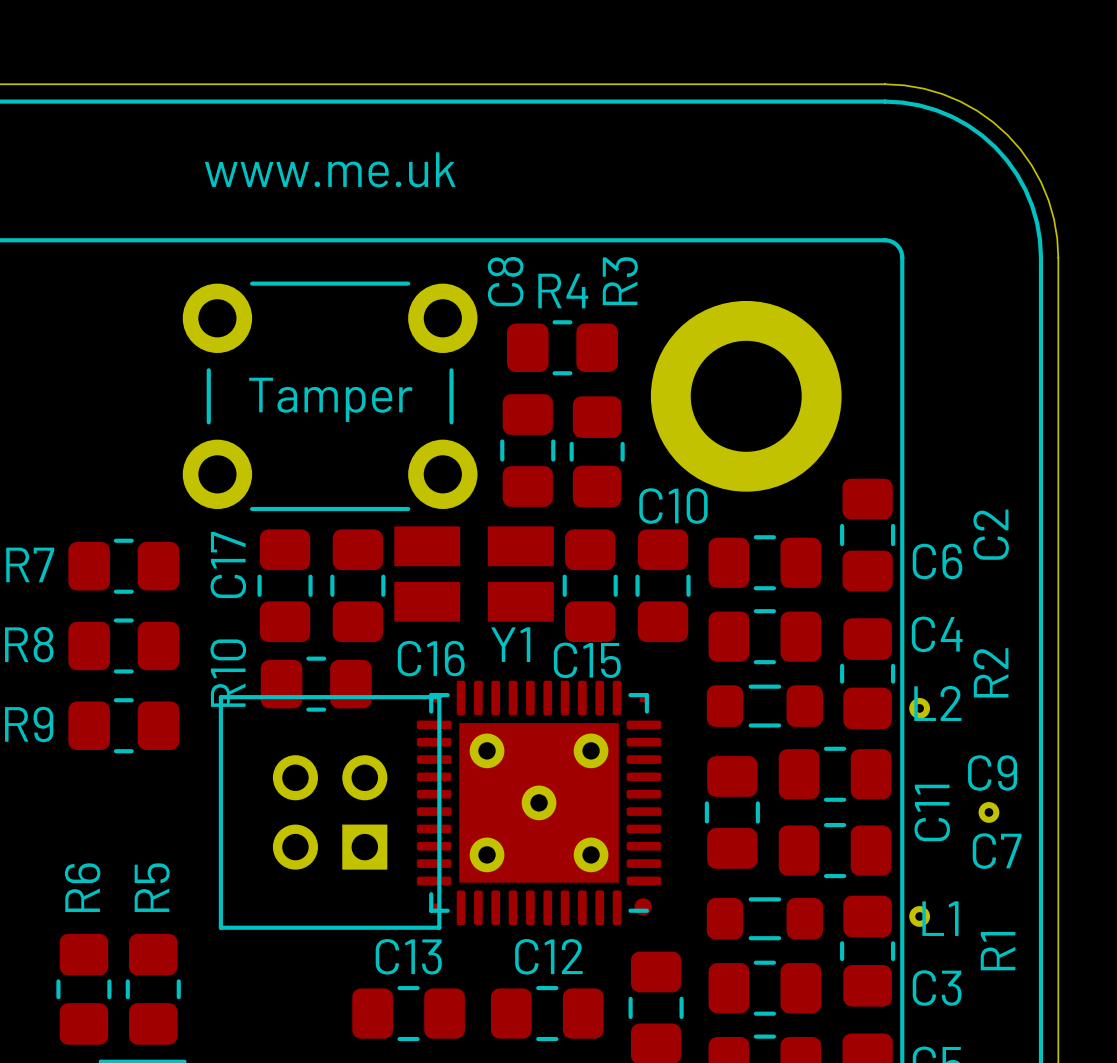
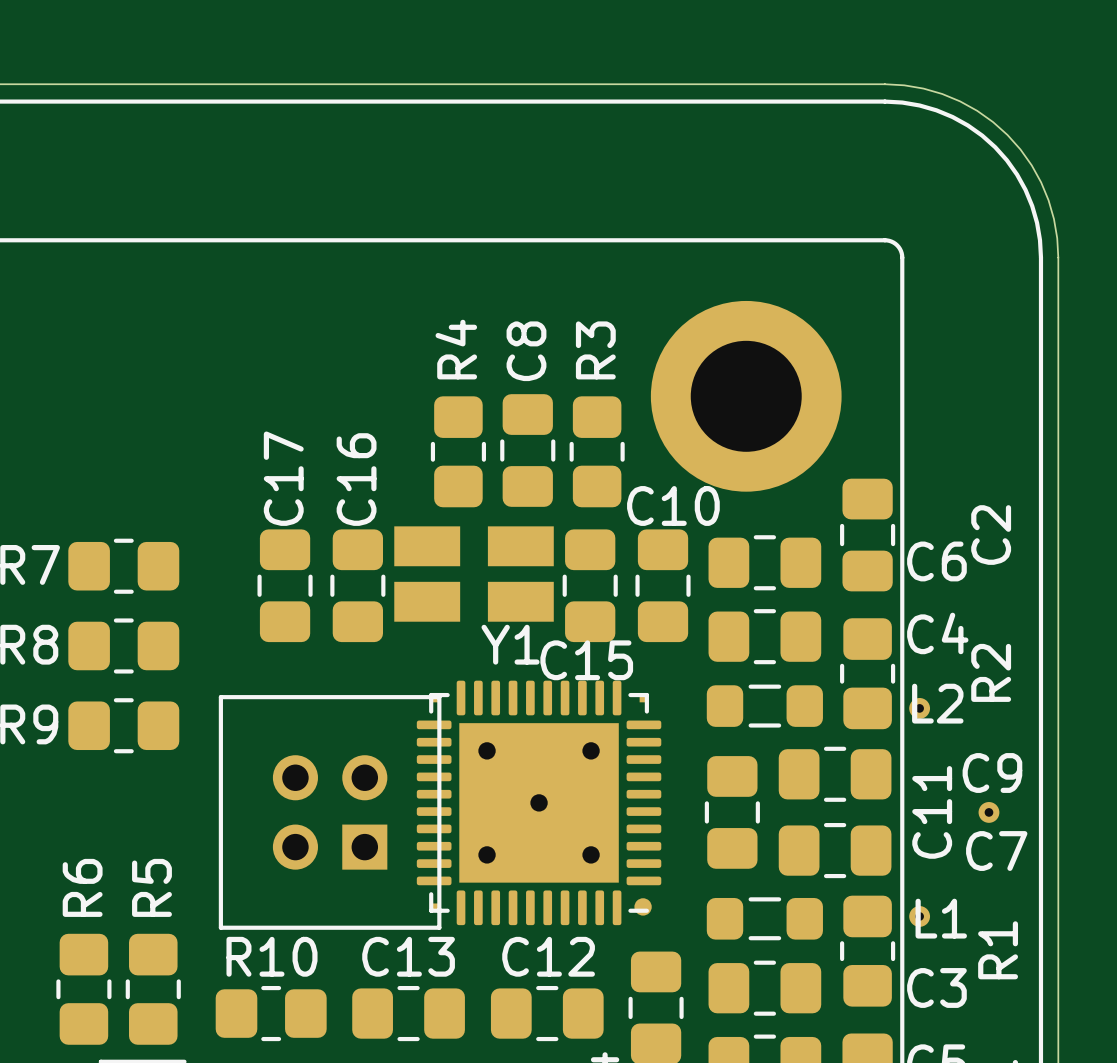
text: www.me.uk (330, 169) -> none
C8 name position: C8 (505, 281) -> C8 (526, 351)
R3 name position: R3 (620, 281) -> R3 (595, 350)
R4 rotation: 0° (562, 347) -> 90° clockwise (458, 451)
R4 position: (562, 347) -> (458, 451)
part: (330, 396) -> none
text: Tamper (330, 399) -> none
C17 name position: C17 (228, 564) -> C17 (283, 478)
C16 name rotation: 0° (431, 658) -> 90° counterclockwise (356, 479)
C16 name position: C16 (431, 658) -> C16 (356, 479)
R10 name rotation: 0° (228, 673) -> 90° clockwise (272, 956)
R10 position: (316, 684) -> (271, 1013)

